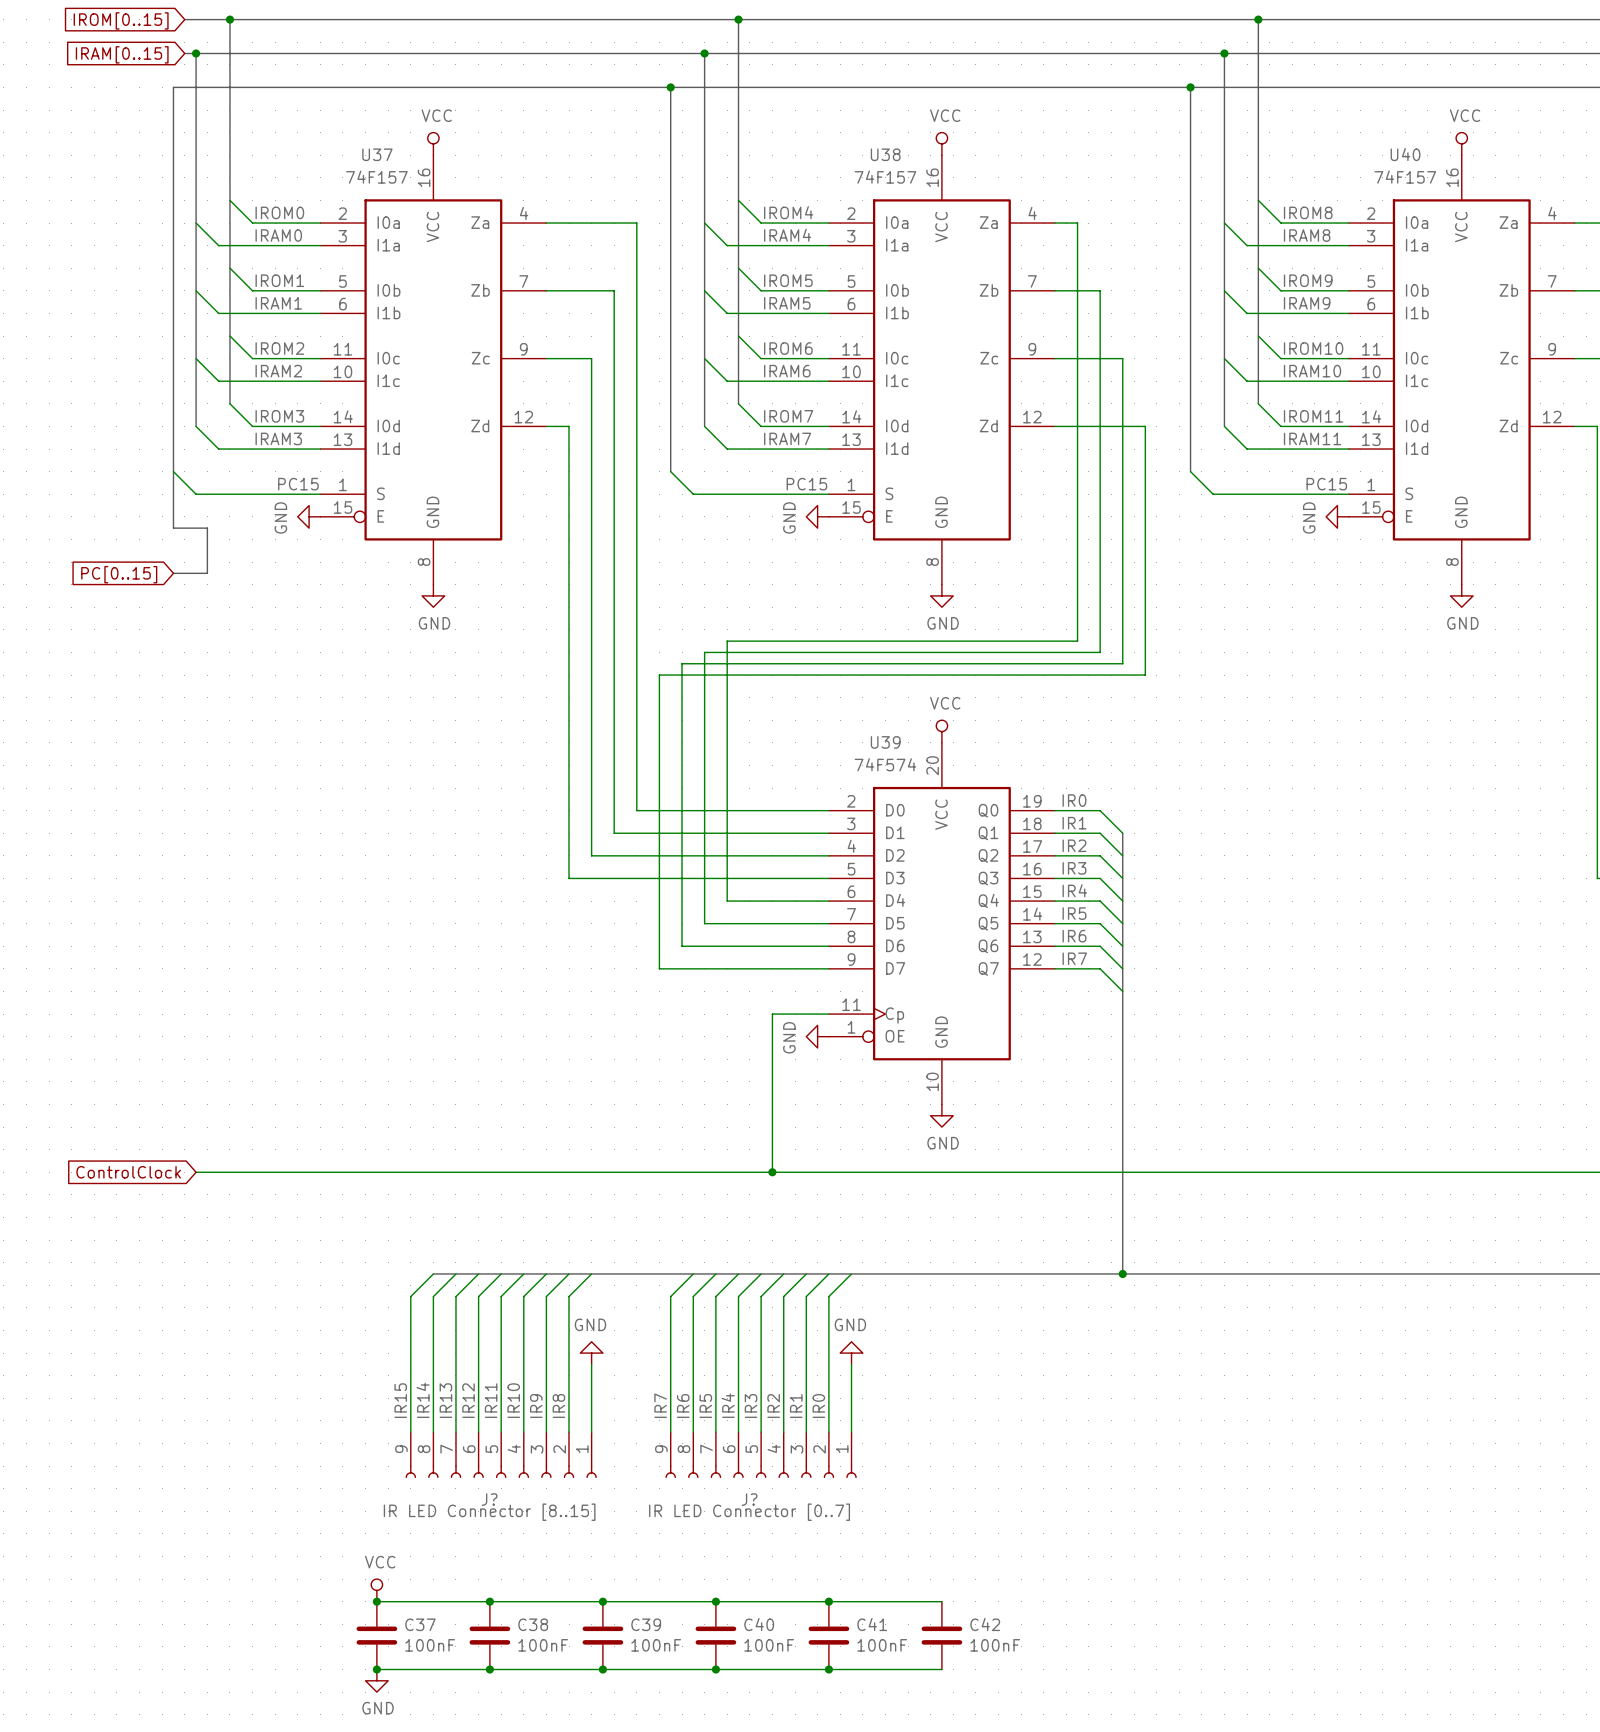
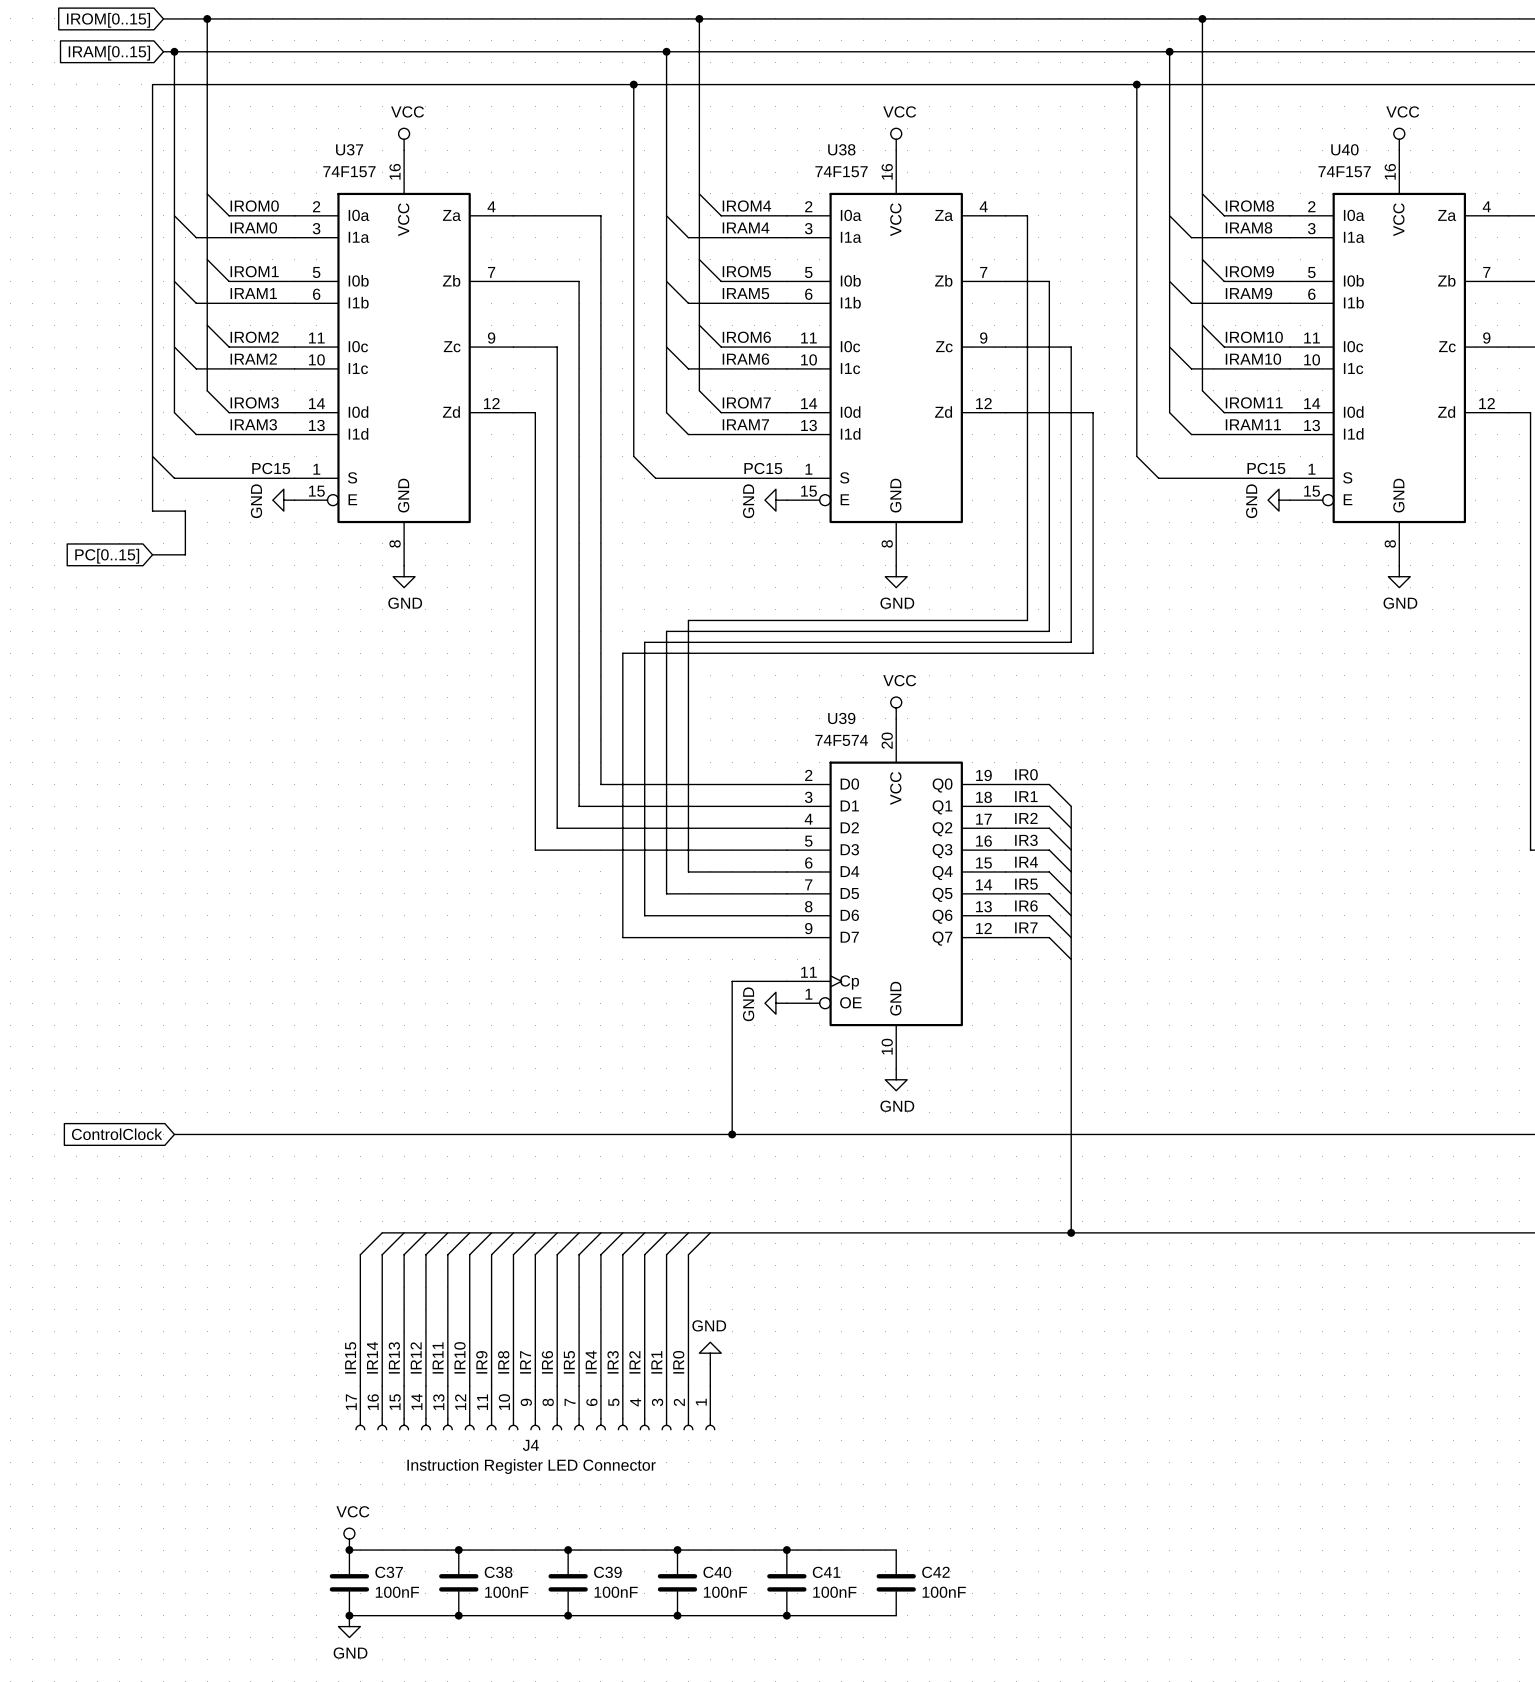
wire: none -> (382, 1232) (360, 1254) (360, 1385)
bus: none -> (382, 1232) (404, 1232)
wire: none -> (579, 1232) (557, 1254) (557, 1320)
wire: (693, 1273) (670, 1296) (670, 1432) -> (600, 1232) (579, 1254) (579, 1385)
wire: (715, 1273) (693, 1296) (693, 1432) -> (622, 1232) (600, 1254) (600, 1385)
wire: (738, 1273) (715, 1296) (715, 1432) -> (644, 1232) (622, 1254) (622, 1385)
wire: (761, 1273) (738, 1296) (738, 1432) -> (666, 1232) (644, 1254) (644, 1385)
wire: (783, 1273) (761, 1296) (761, 1432) -> (688, 1232) (666, 1254) (666, 1385)
wire: (806, 1273) (783, 1296) (783, 1432) -> (710, 1232) (688, 1254) (688, 1385)
wire: (828, 1273) (806, 1296) (806, 1432) -> none
wire: (851, 1273) (828, 1296) (828, 1432) -> none
power symbol: GND (591, 1353) -> none
power symbol: GND (851, 1353) -> none
wire: (851, 1364) (851, 1432) -> none
power symbol: none -> GND (710, 1353)
label: none -> IR15 (350, 1357)
label: IR15 (400, 1400) -> IR14 (372, 1357)
label: IR14 (423, 1400) -> IR13 (394, 1357)
label: IR13 (445, 1400) -> IR12 (416, 1357)
label: IR12 (468, 1400) -> IR11 (438, 1357)
label: IR11 (491, 1400) -> IR10 (459, 1357)
label: IR10 (513, 1400) -> IR9 (481, 1362)
label: IR7 (660, 1405) -> none
label position: IR4 (728, 1405) -> IR4 (591, 1362)
label: IR9 (536, 1406) -> IR8 (503, 1362)
label: IR8 (558, 1406) -> IR7 (525, 1362)
label position: IR6 (683, 1406) -> IR6 (547, 1362)
label position: IR5 (705, 1406) -> IR5 (569, 1362)
label position: IR3 (751, 1406) -> IR3 (613, 1362)
label position: IR2 (773, 1406) -> IR2 (634, 1362)
label position: IR1 (796, 1406) -> IR1 (656, 1362)
label position: IR0 (818, 1406) -> IR0 (678, 1362)
wire: none -> (710, 1364) (710, 1385)
J?: IR LED Connector [8..15] (501, 1455) -> none
J4: none -> Instruction Register LED Connector (535, 1408)
J?: IR LED Connector [0..7] (761, 1455) -> none

